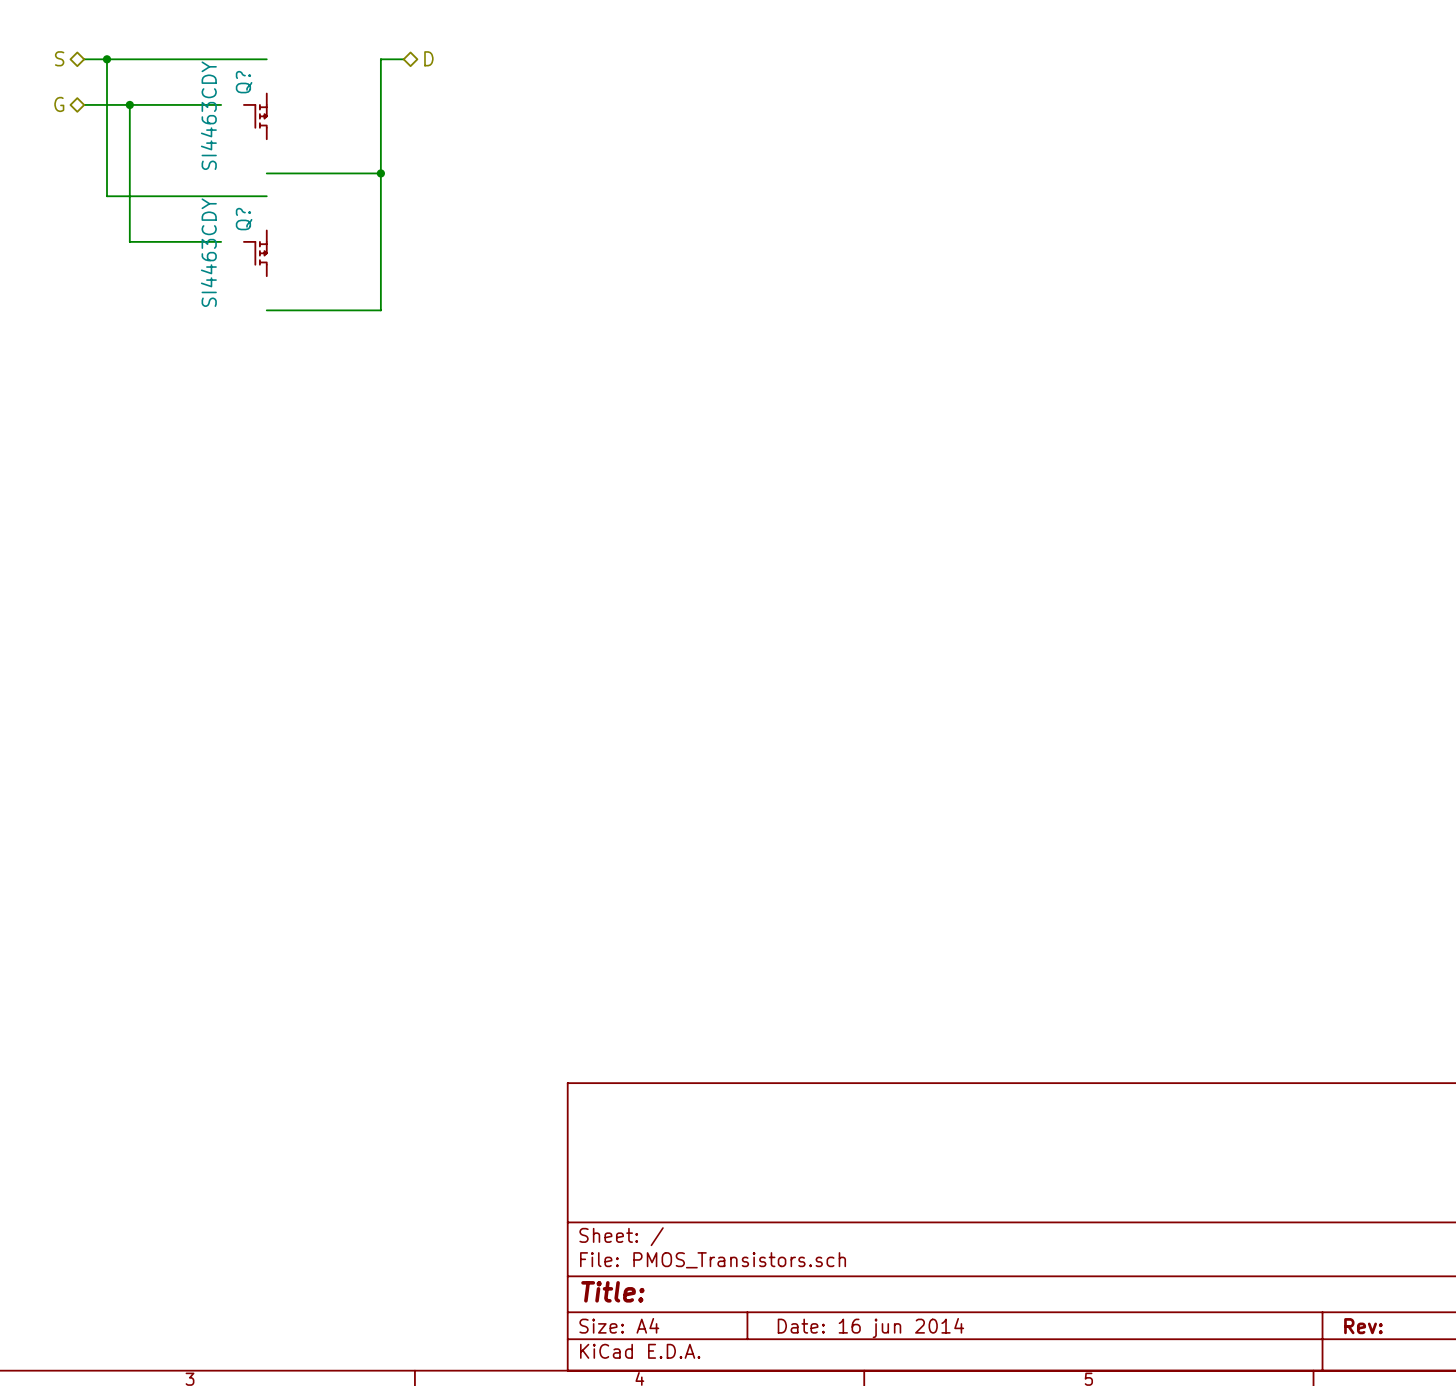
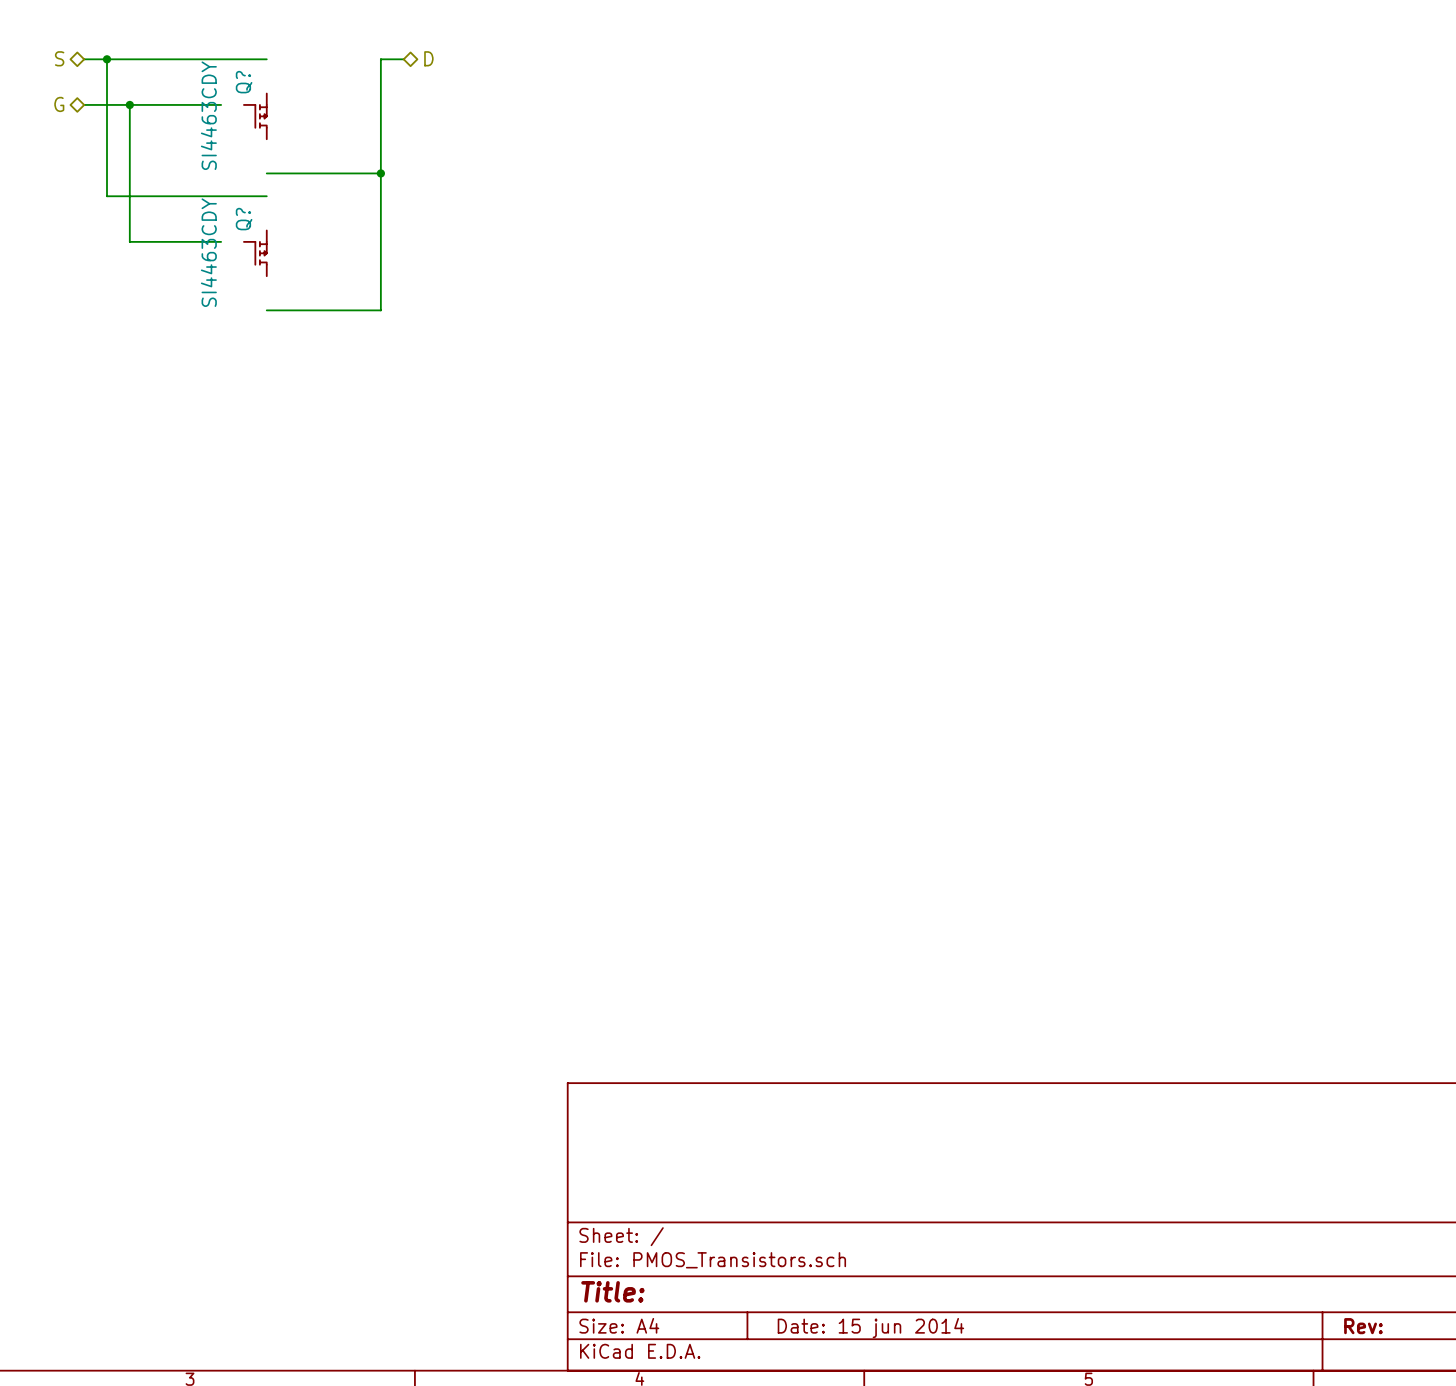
title block: Date: 16 jun 2014 (870, 1328) -> Date: 15 jun 2014 (870, 1328)

